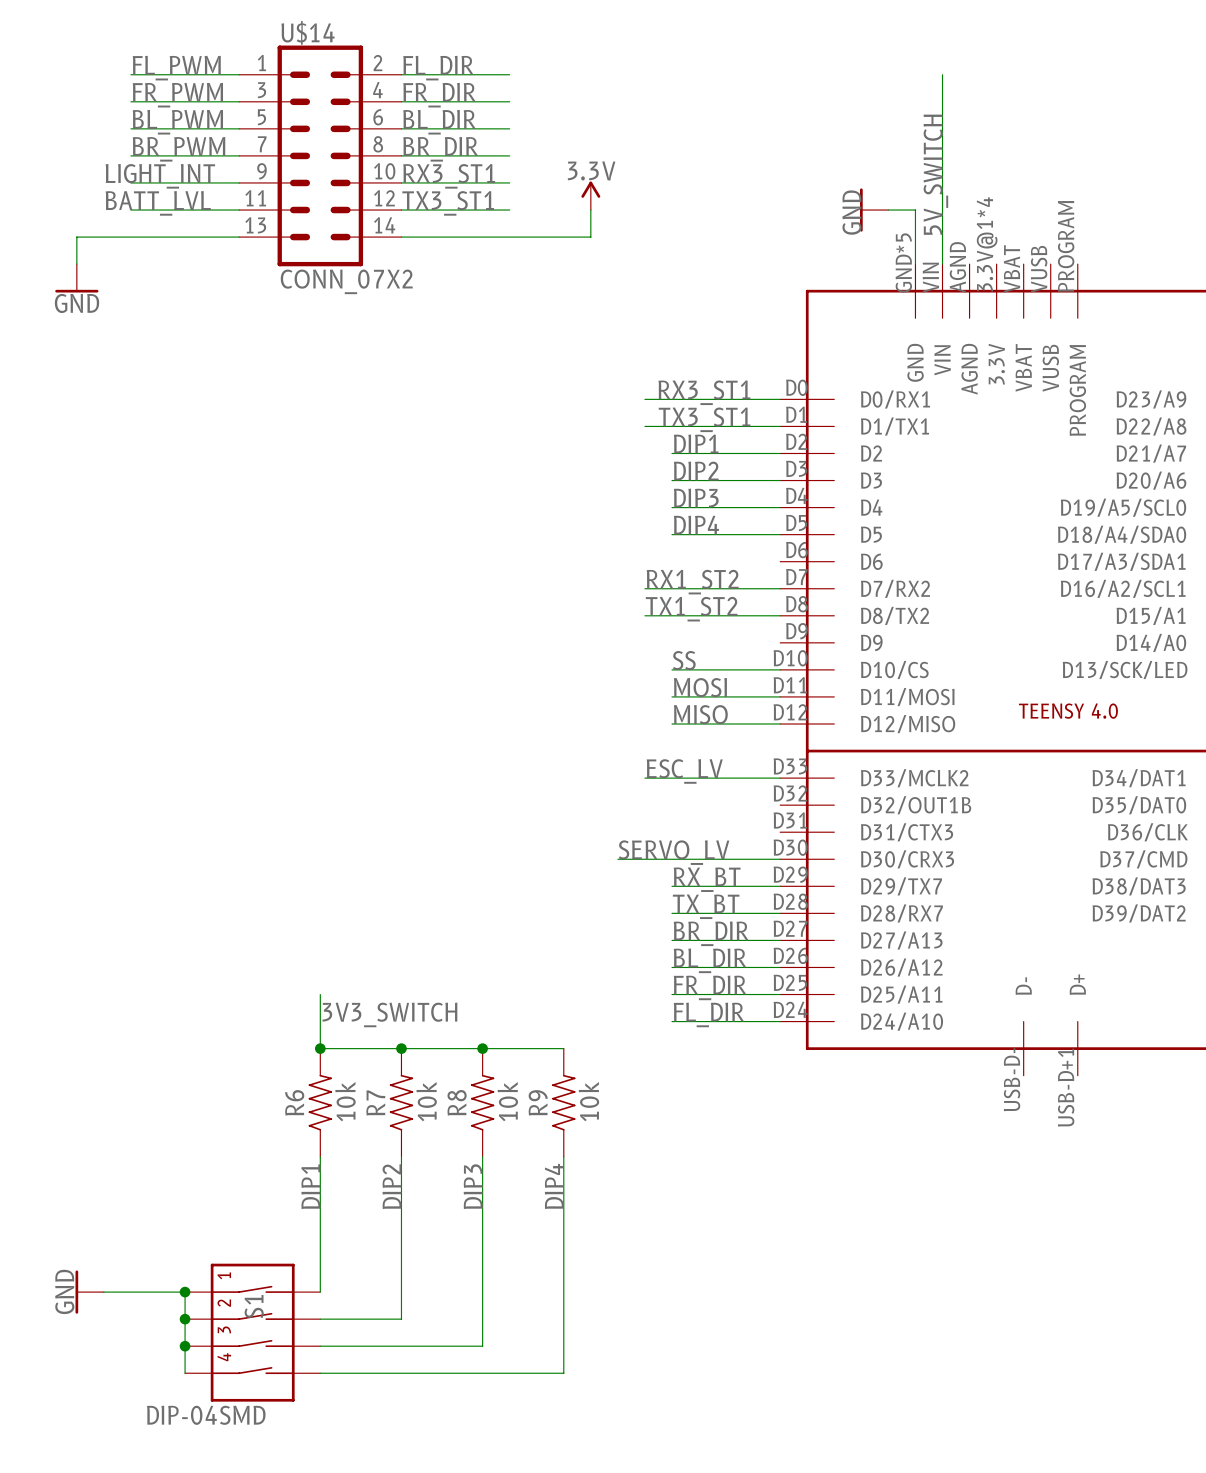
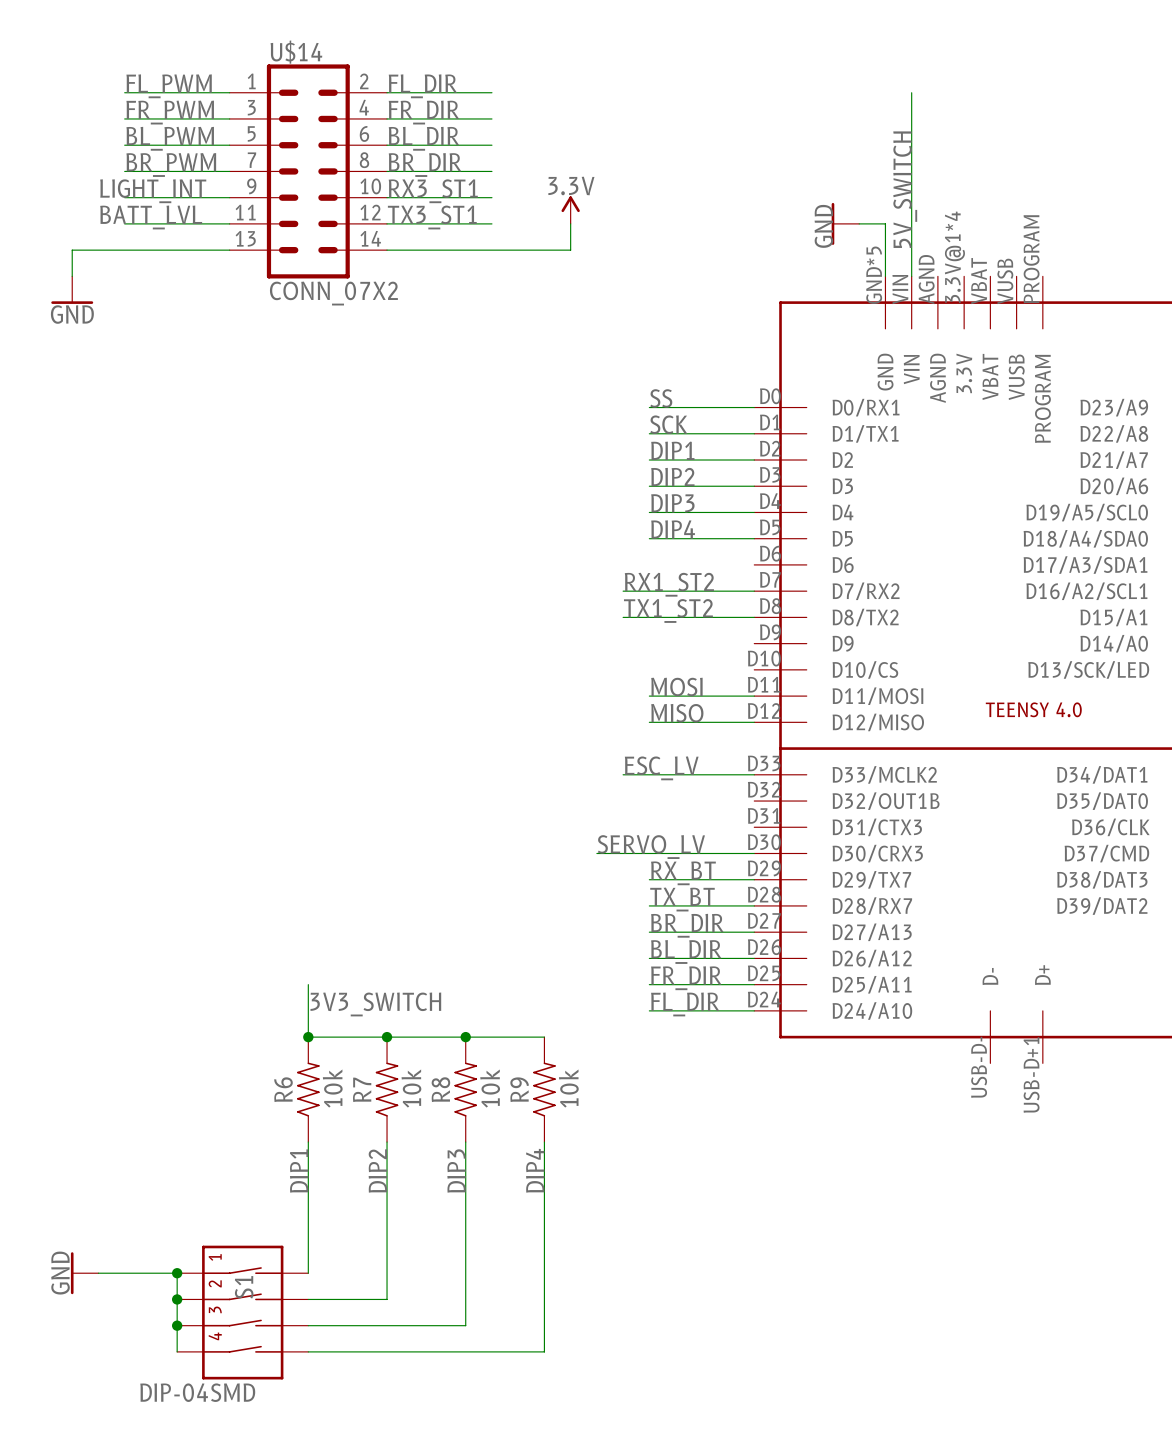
label: none -> SS (661, 398)
label: RX3_ST1 (704, 392) -> none
wire: (644, 399) (671, 399) -> none
label: none -> SCK (668, 424)
label: TX3_ST1 (704, 419) -> none
wire: (644, 426) (671, 426) -> none
label: SS (684, 660) -> none
wire: (671, 669) (780, 669) -> none

